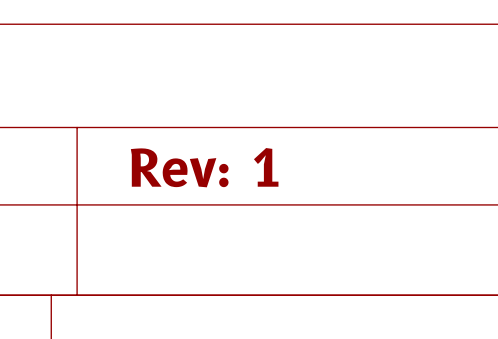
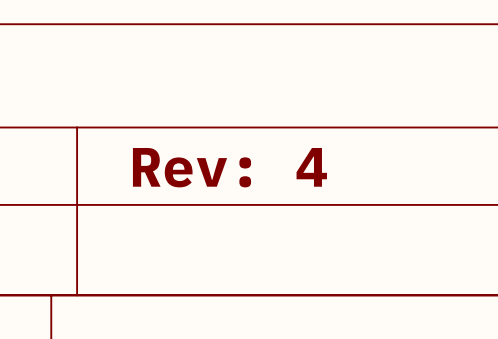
title block: Rev: 1 (204, 167) -> Rev: 4 (229, 167)

